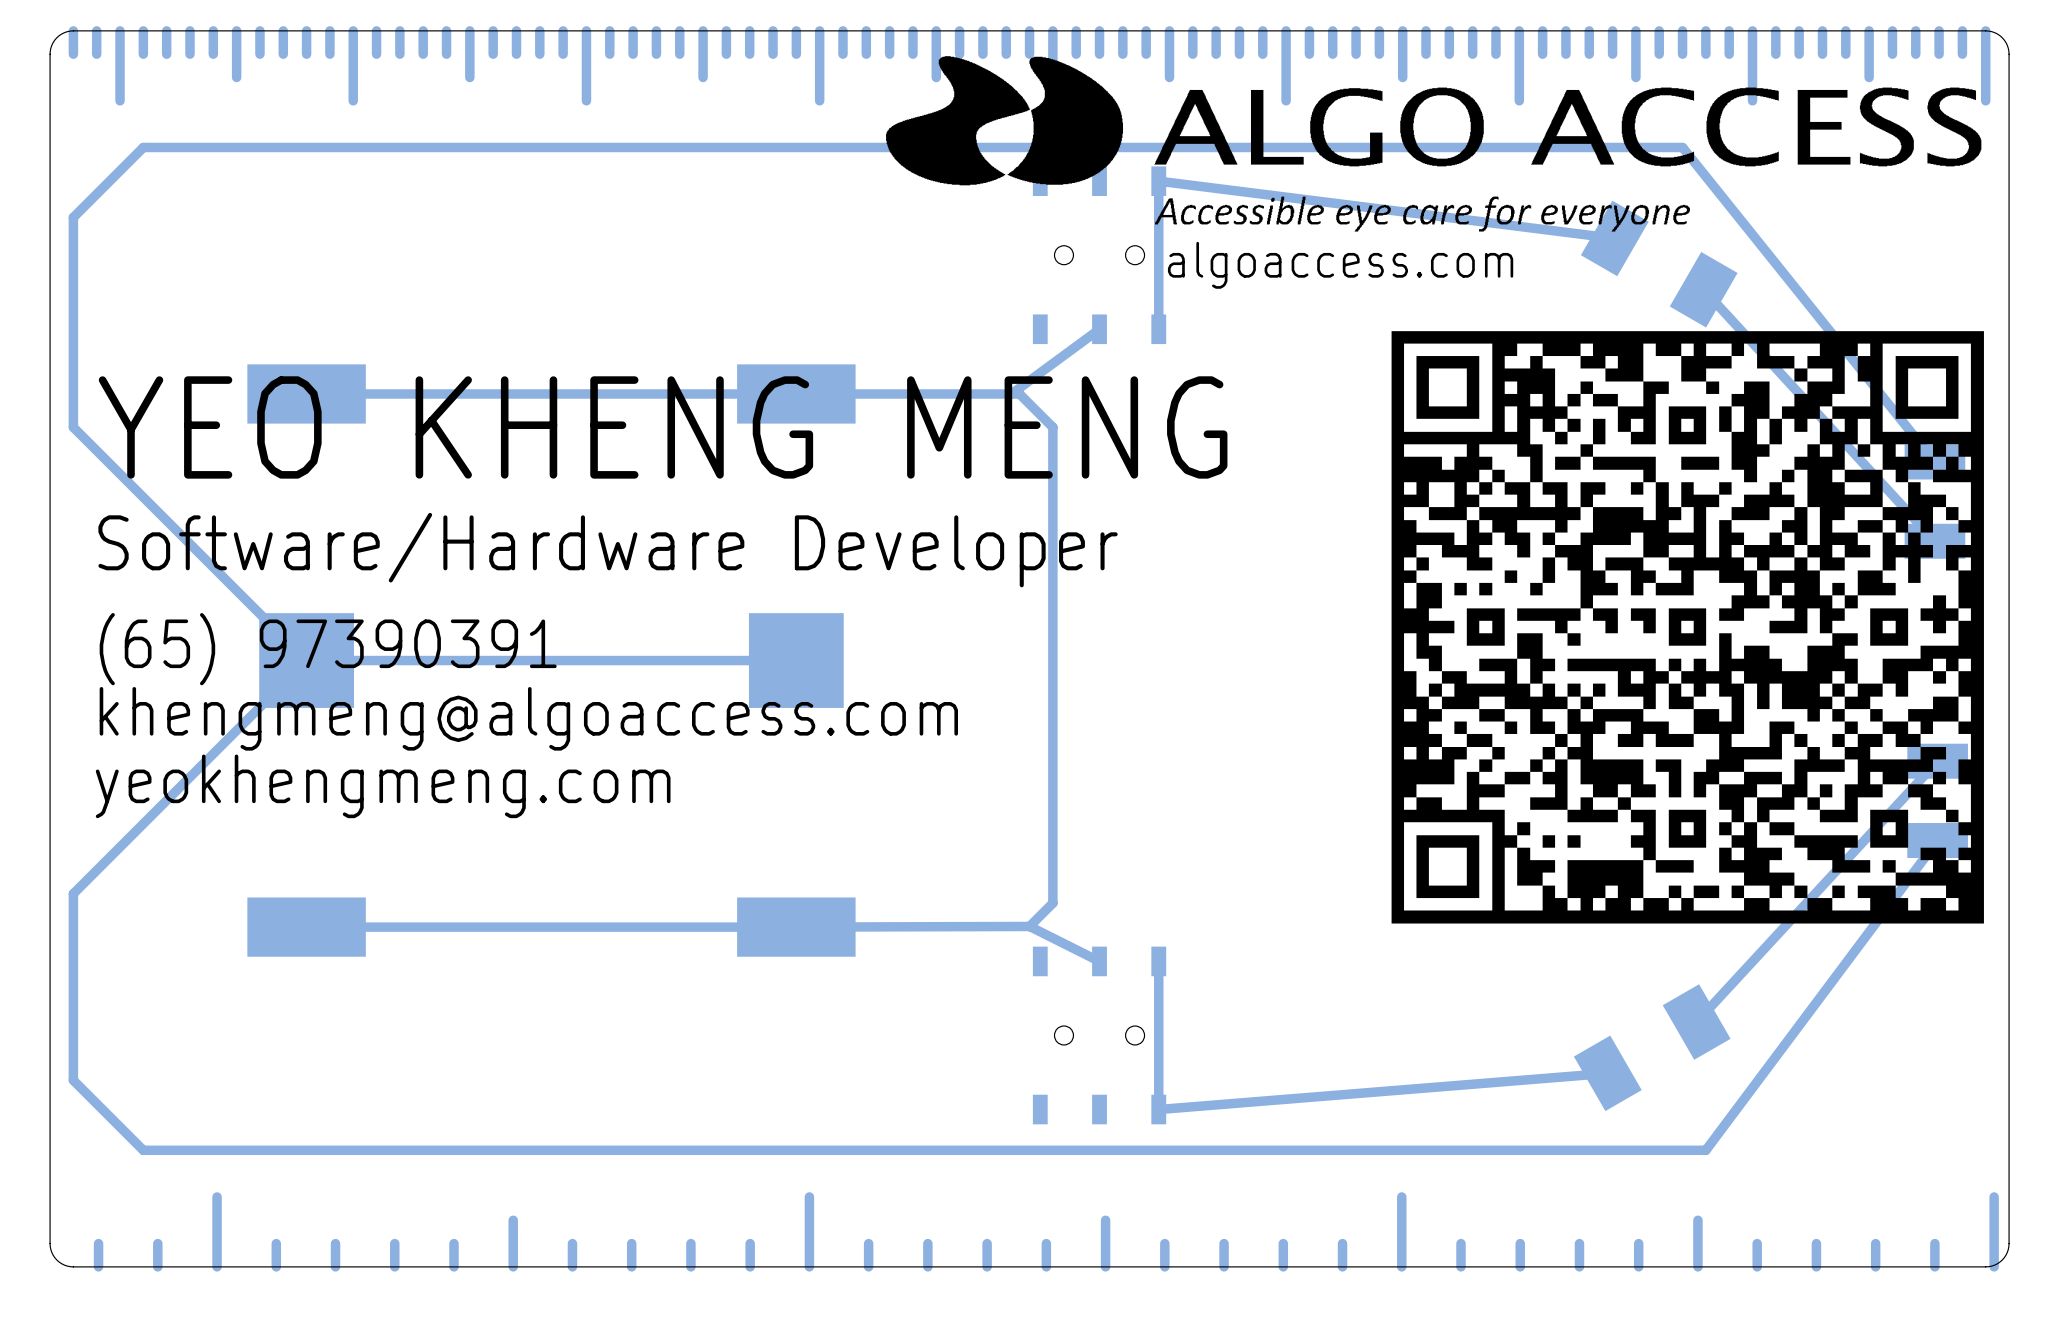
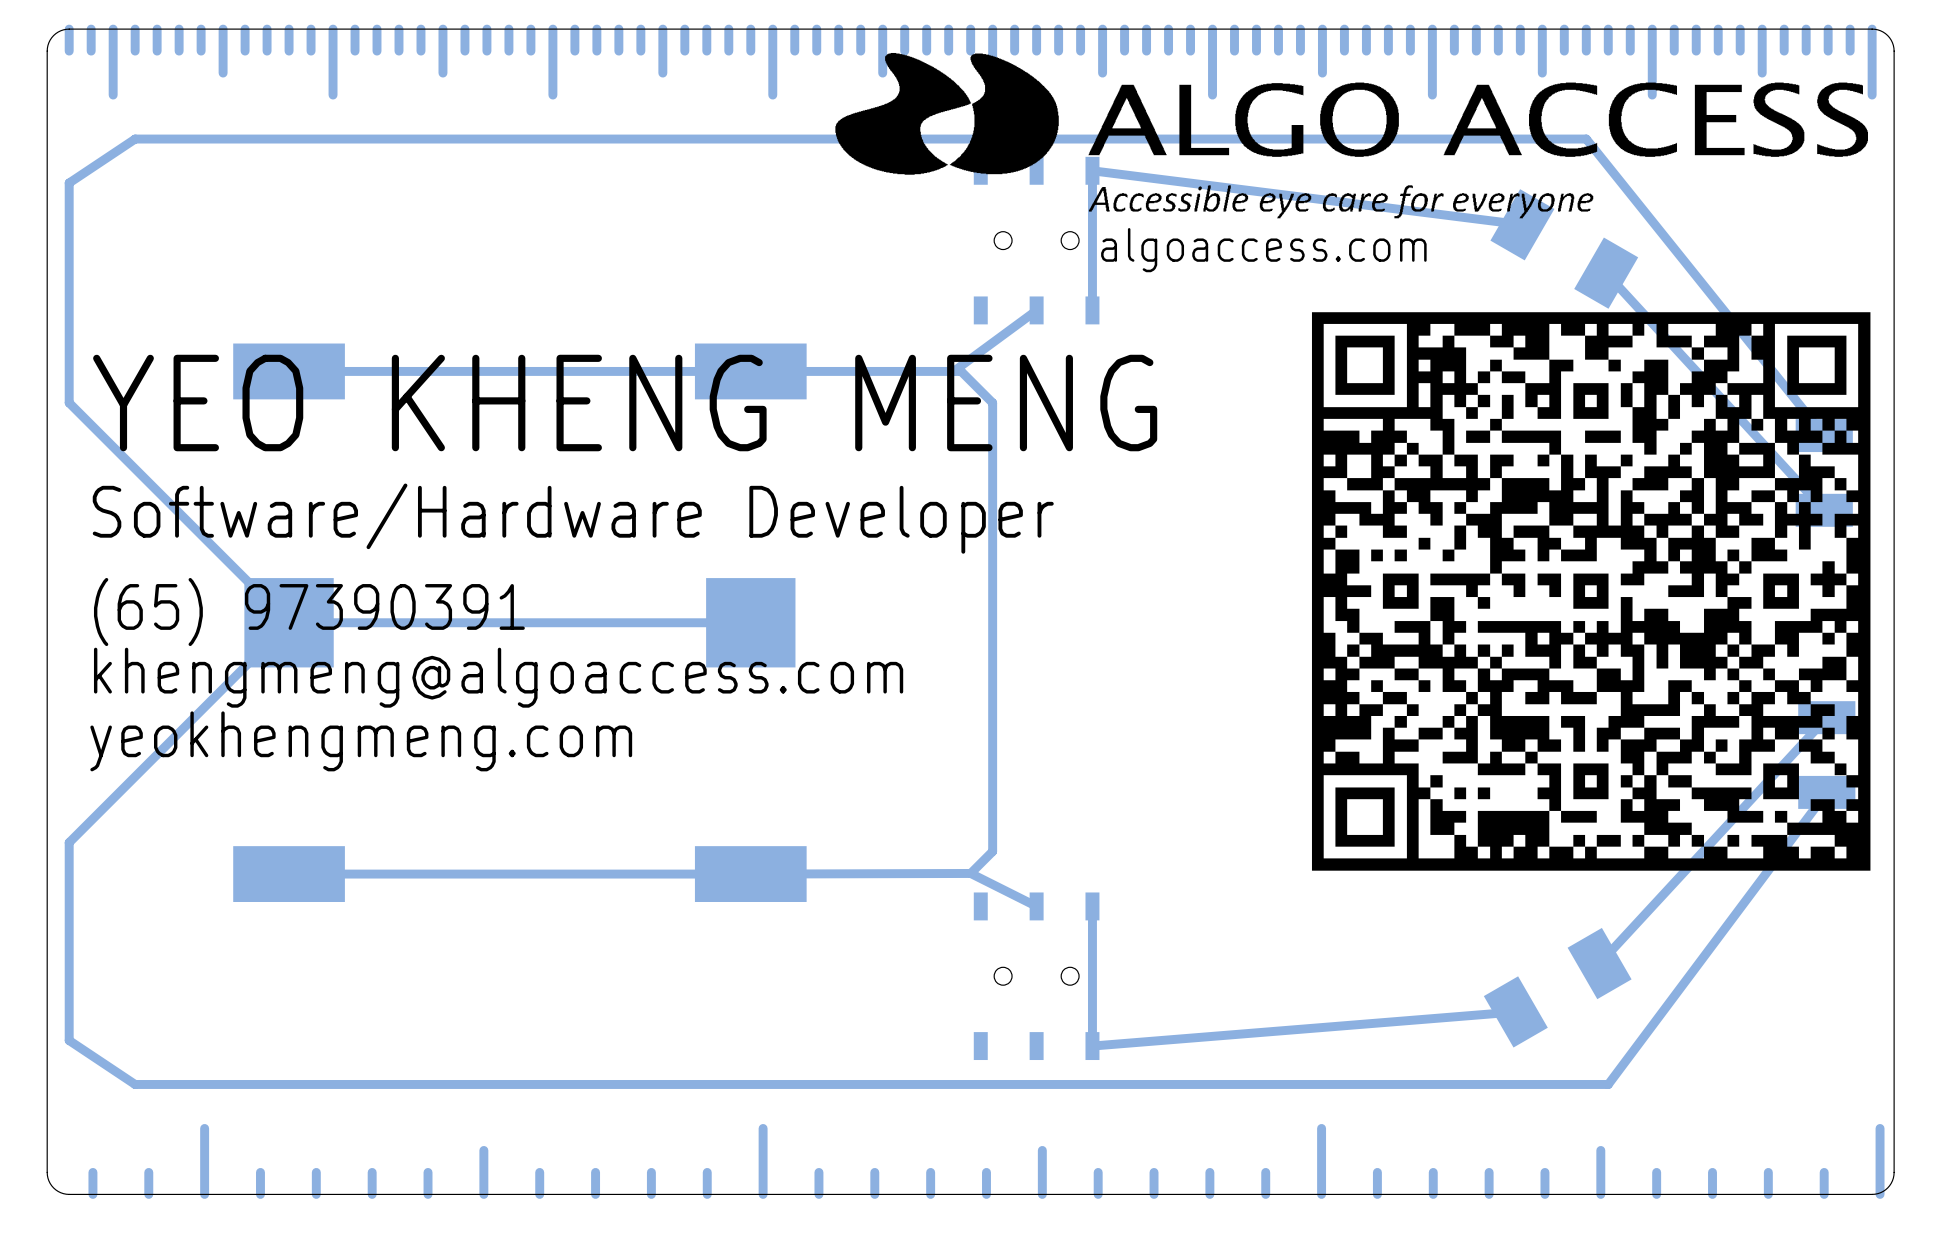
bottom track: (143, 147) (73, 217) -> (135, 139) (69, 183) (69, 205)
bottom track: (73, 1080) (143, 1150) -> (69, 1018) (69, 1040) (135, 1084)

